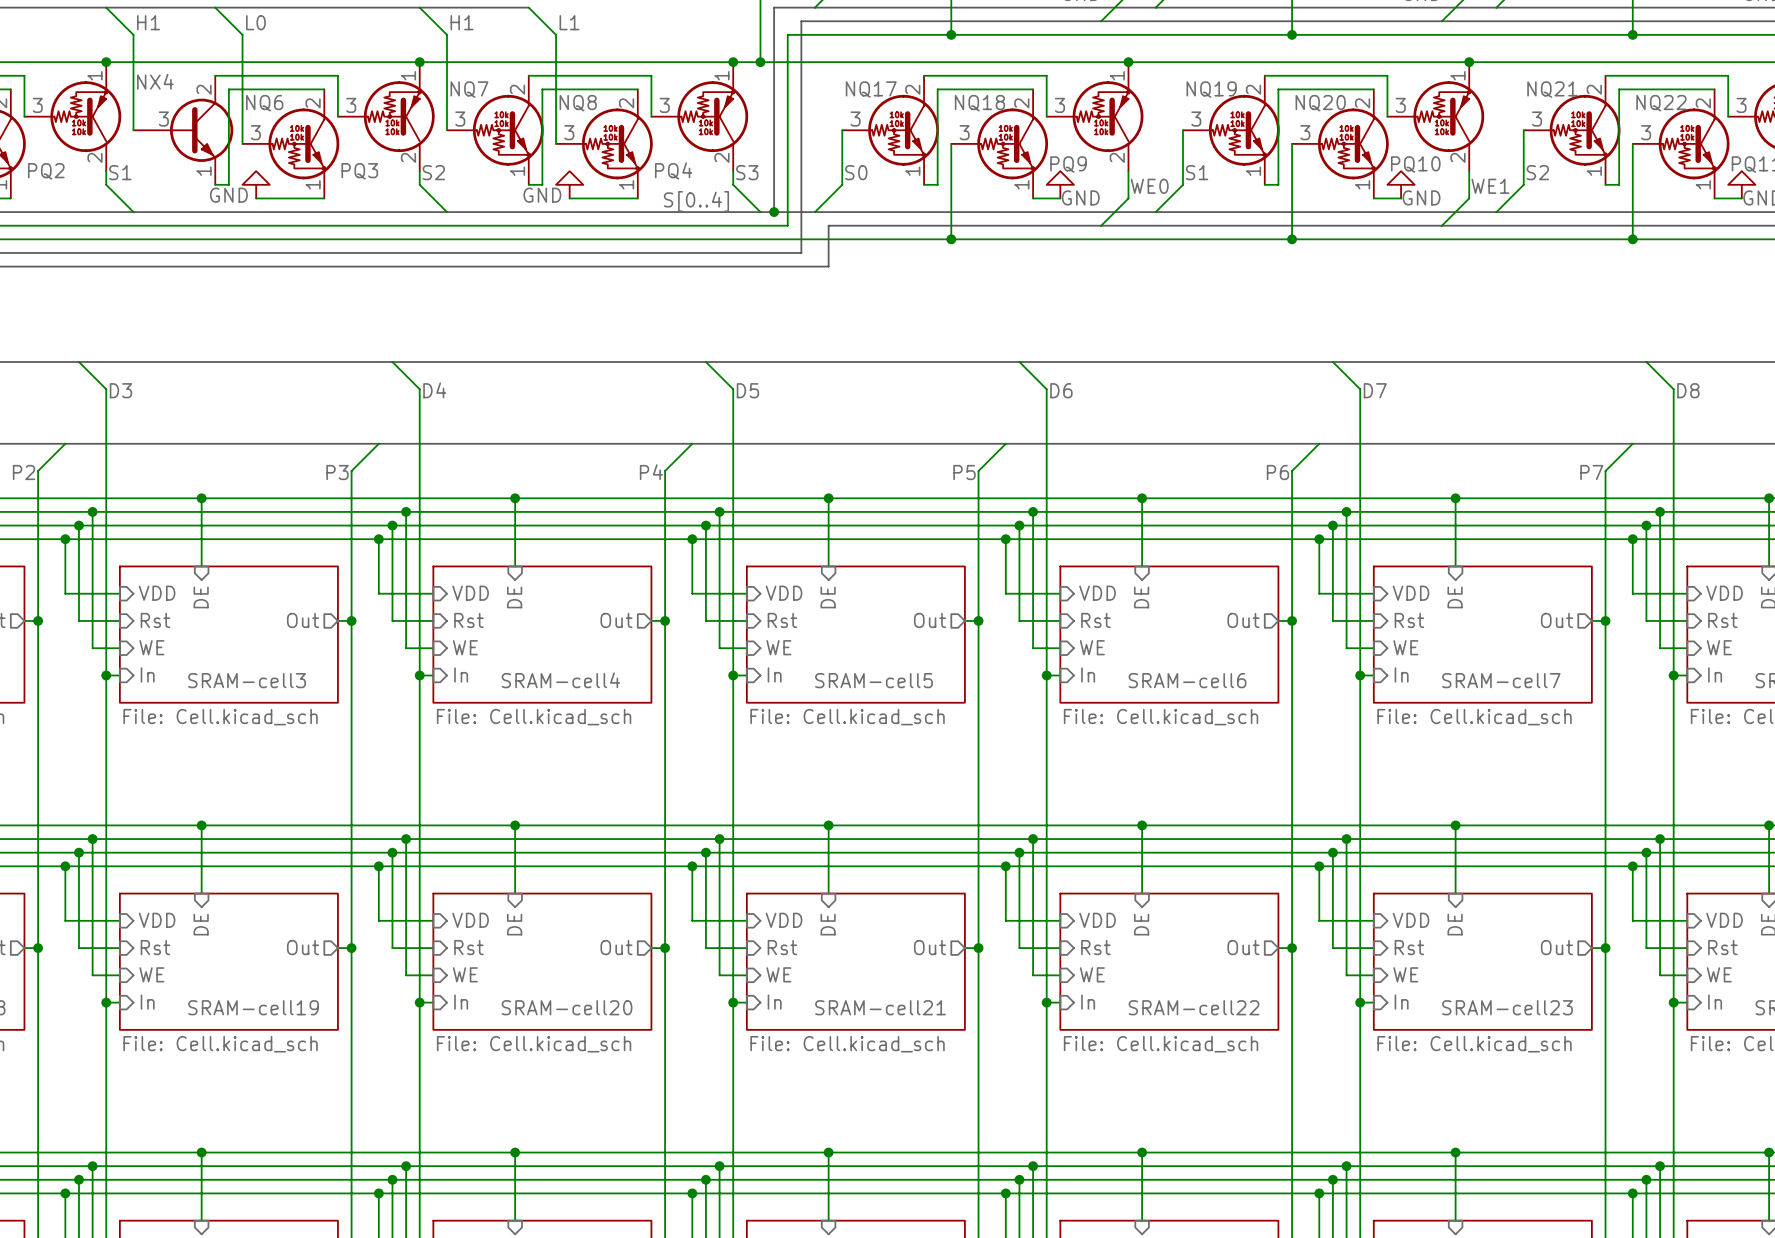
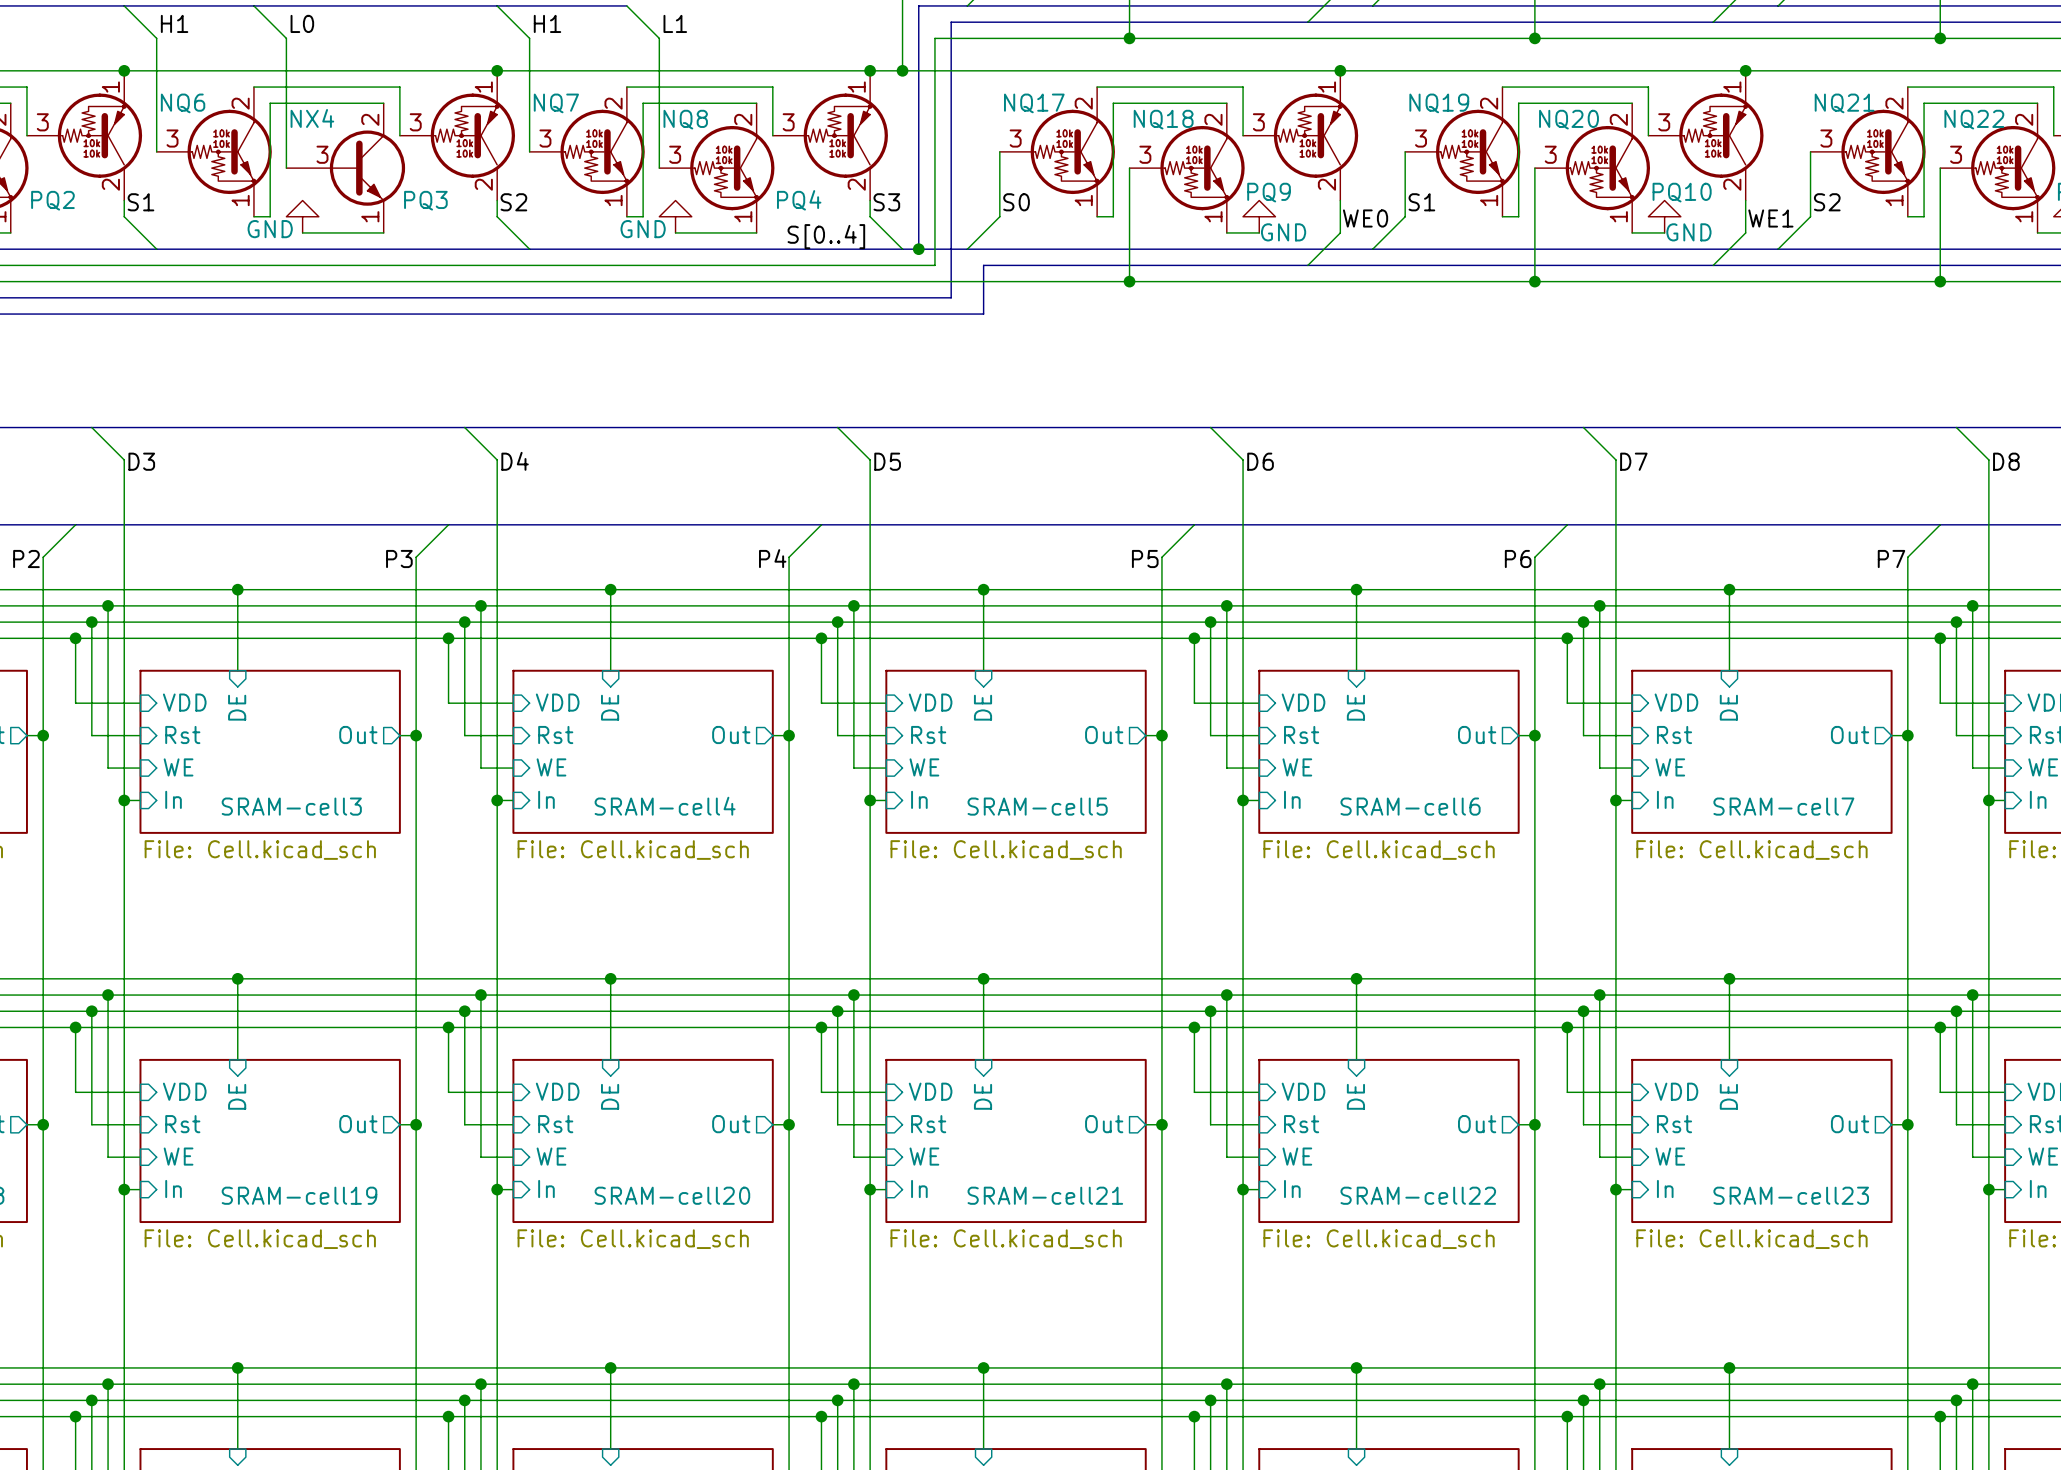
NX4 name position: NX4 (155, 81) -> NX4 (312, 118)
NX4 position: (183, 130) -> (345, 168)
NQ6 position: (290, 143) -> (214, 151)

